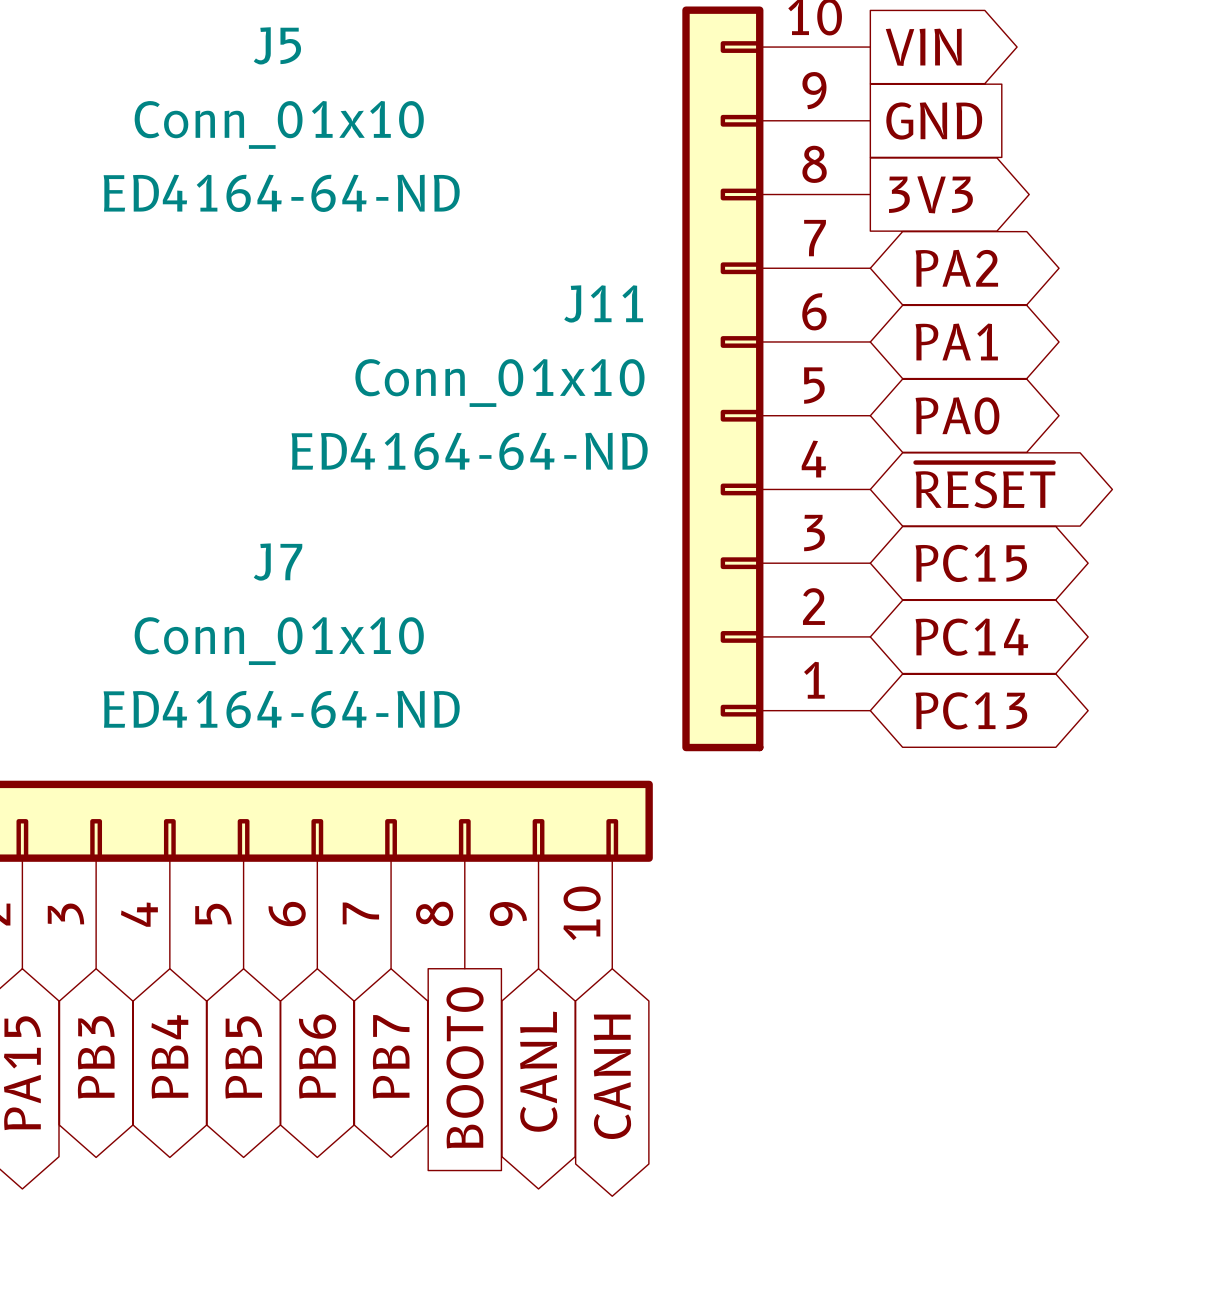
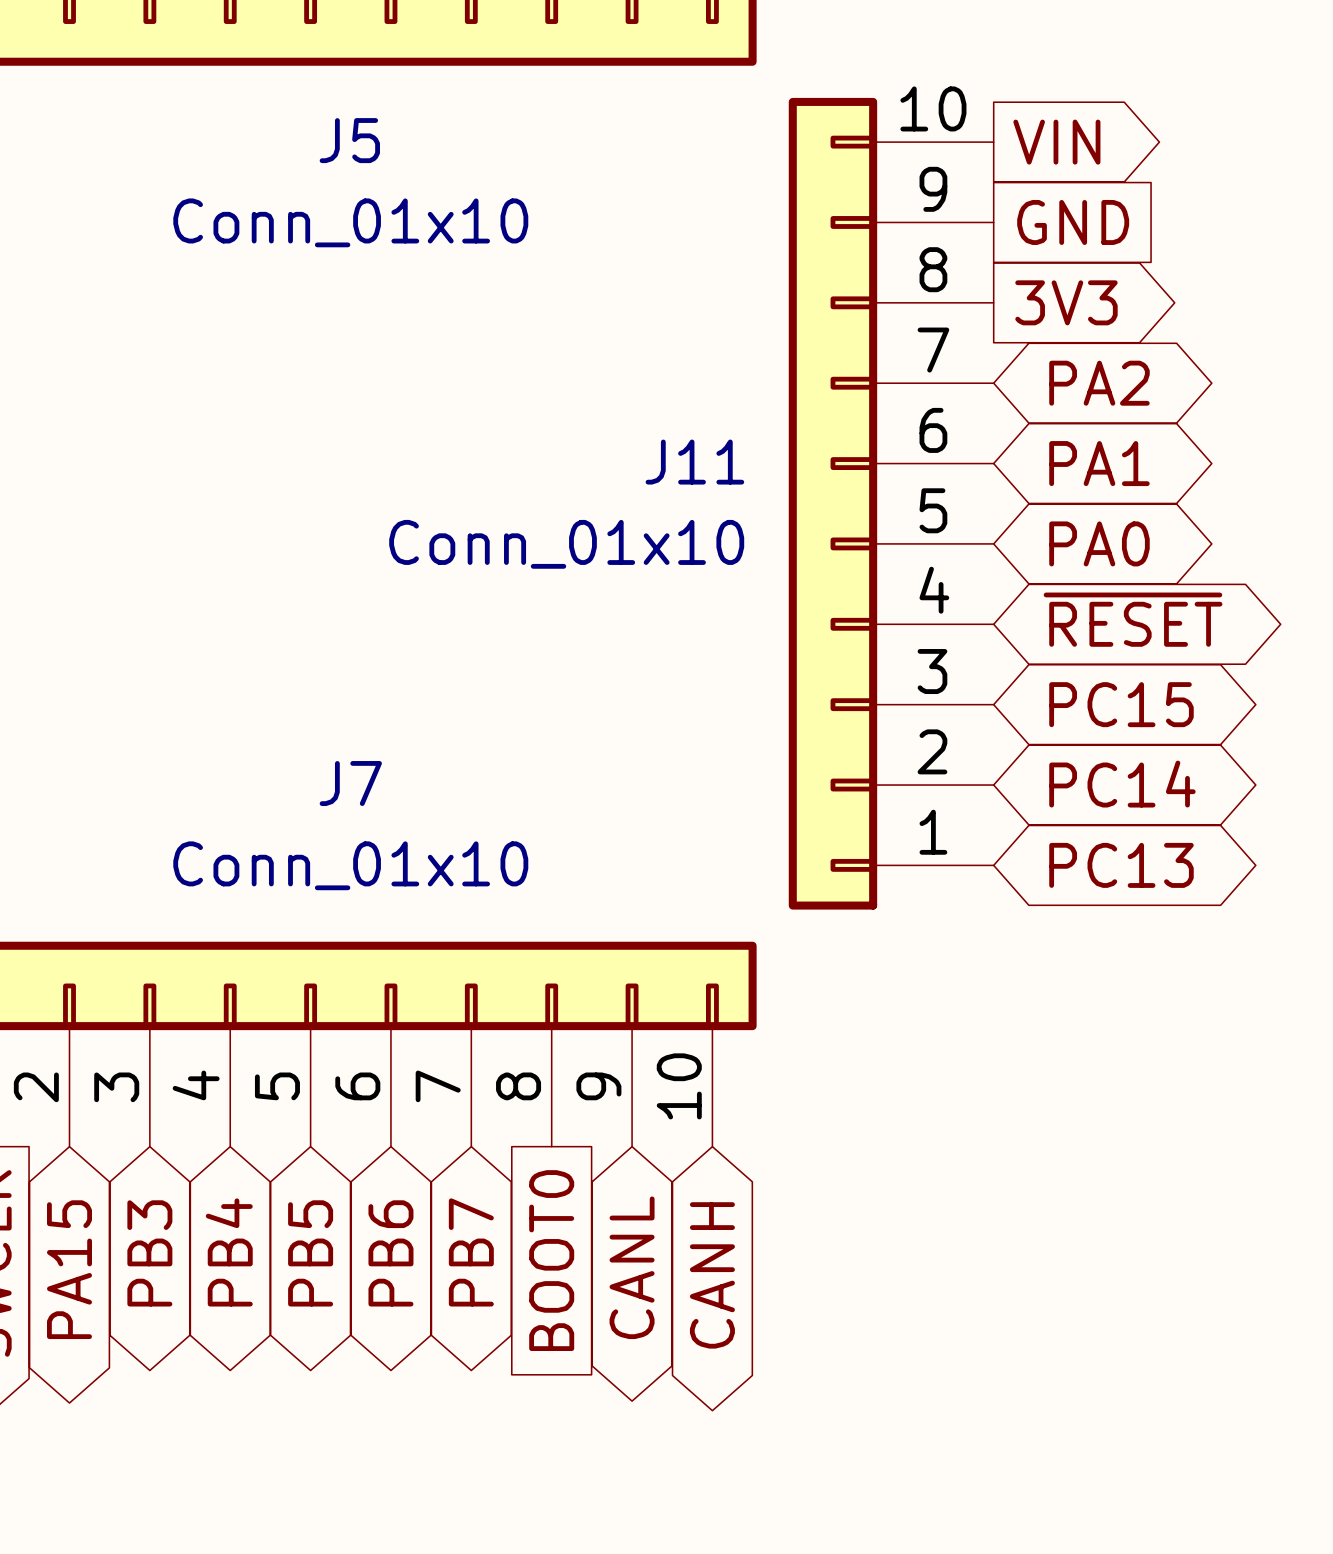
J5 text: ED4164-64-ND (281, 193) -> none
J11 name position: J11 (603, 303) -> J11 (694, 462)
J11 value position: Conn_01x10 (499, 382) -> Conn_01x10 (566, 544)
J11 text: ED4164-64-ND (469, 451) -> none
J7 name position: J7 (278, 562) -> J7 (350, 783)
J7 value position: Conn_01x10 (279, 641) -> Conn_01x10 (350, 865)
J7 text: ED4164-64-ND (281, 709) -> none

